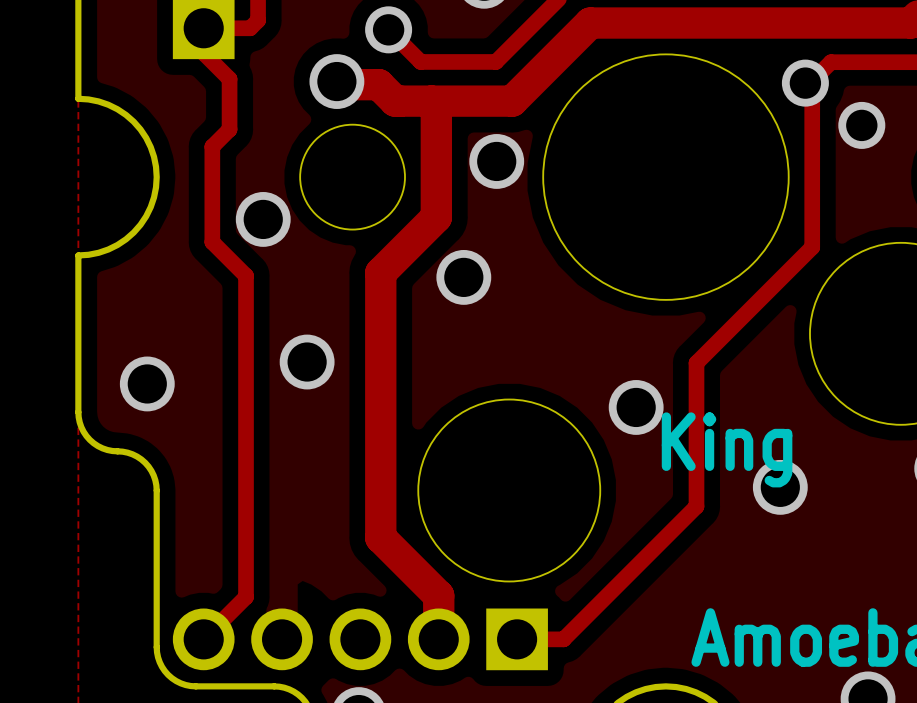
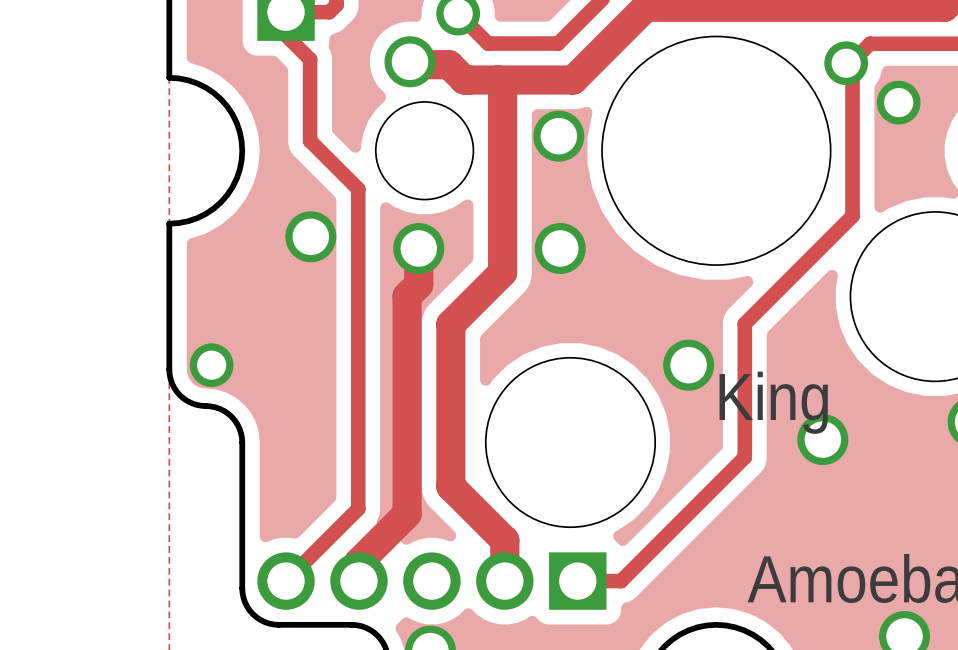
track: (229, 129) (212, 146) (212, 242) (246, 275) (246, 597) -> (310, 106) (310, 140) (358, 189) (358, 508) (325, 541)
track: (436, 217) (380, 272) (380, 363) -> (502, 188) (502, 272) (450, 324)
via position: (263, 219) -> (310, 236)
via position: (463, 277) -> (560, 248)
track: none -> (418, 248) (418, 284) (407, 296) (407, 513) (358, 562) (358, 581)
via: none -> (418, 248)
via: (307, 362) -> none
via position: (147, 383) -> (211, 365)

